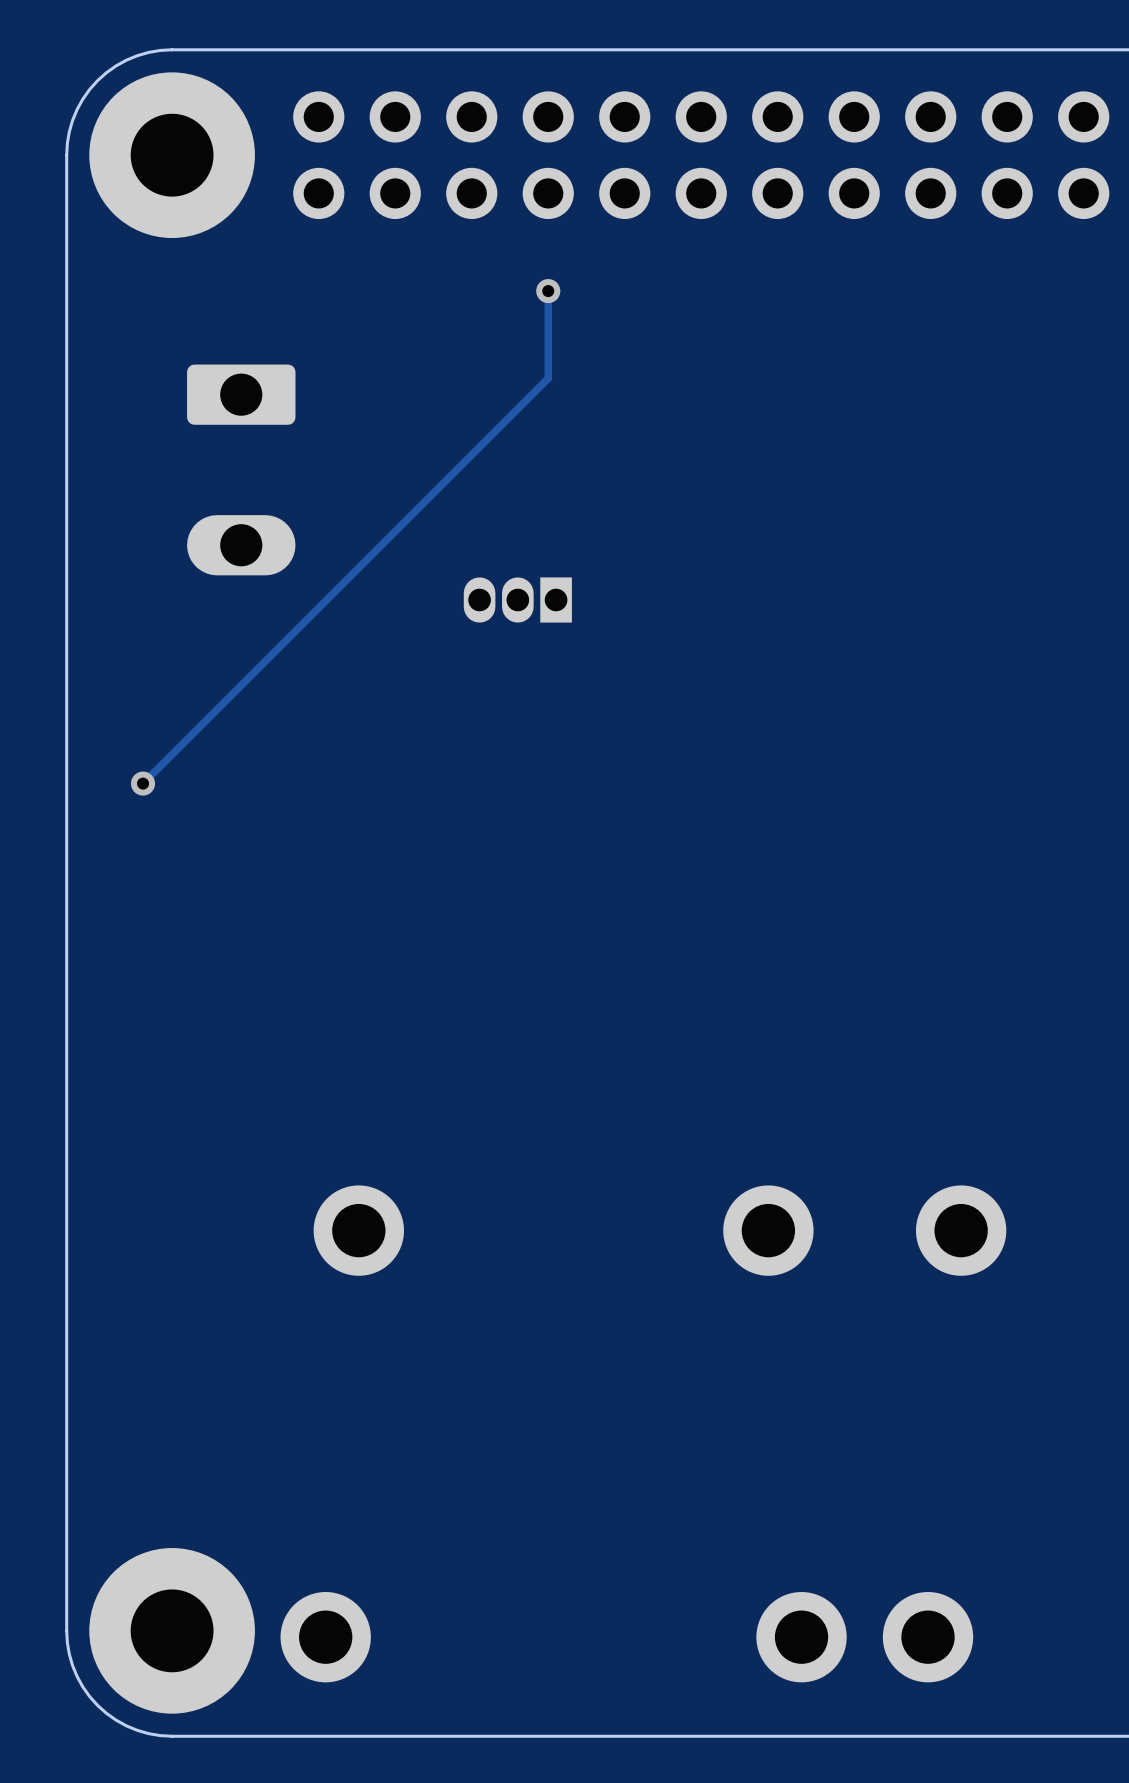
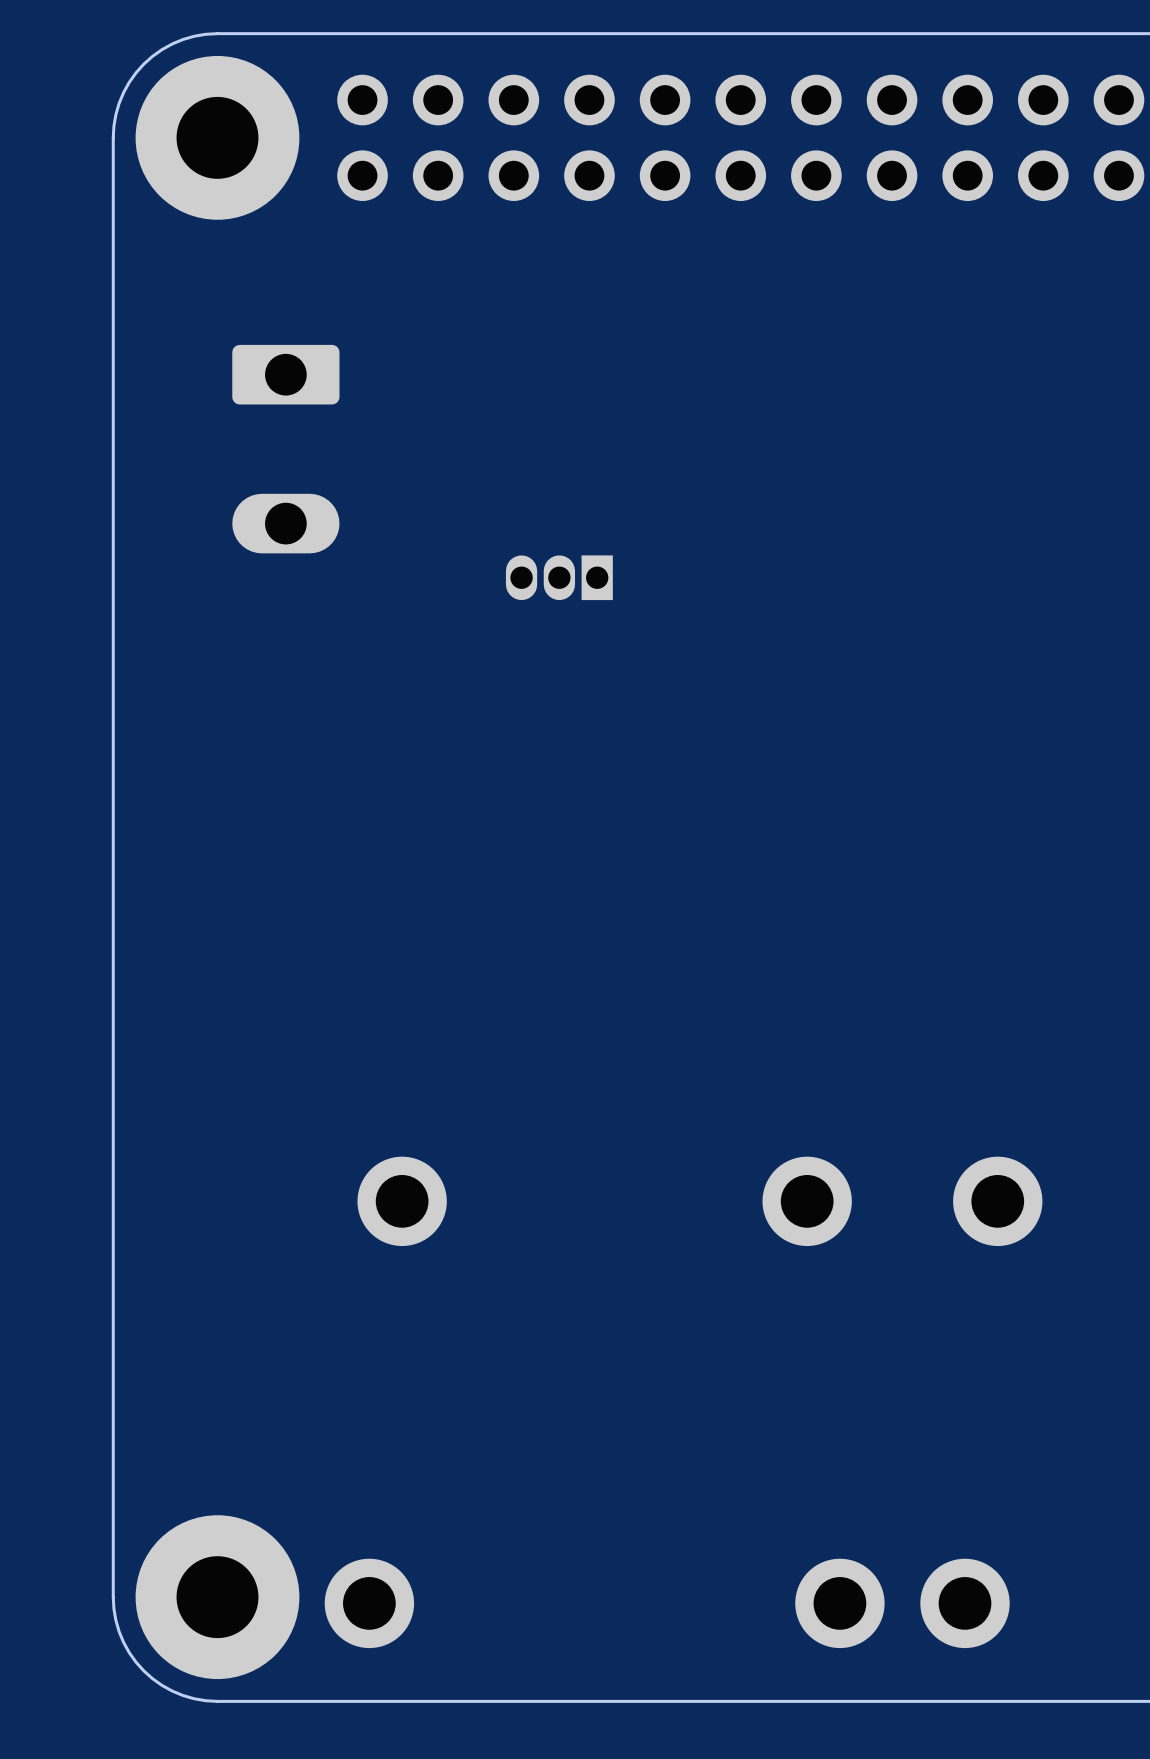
track: (548, 291) (548, 378) (143, 783) -> none
via: (548, 291) -> none
via: (143, 783) -> none

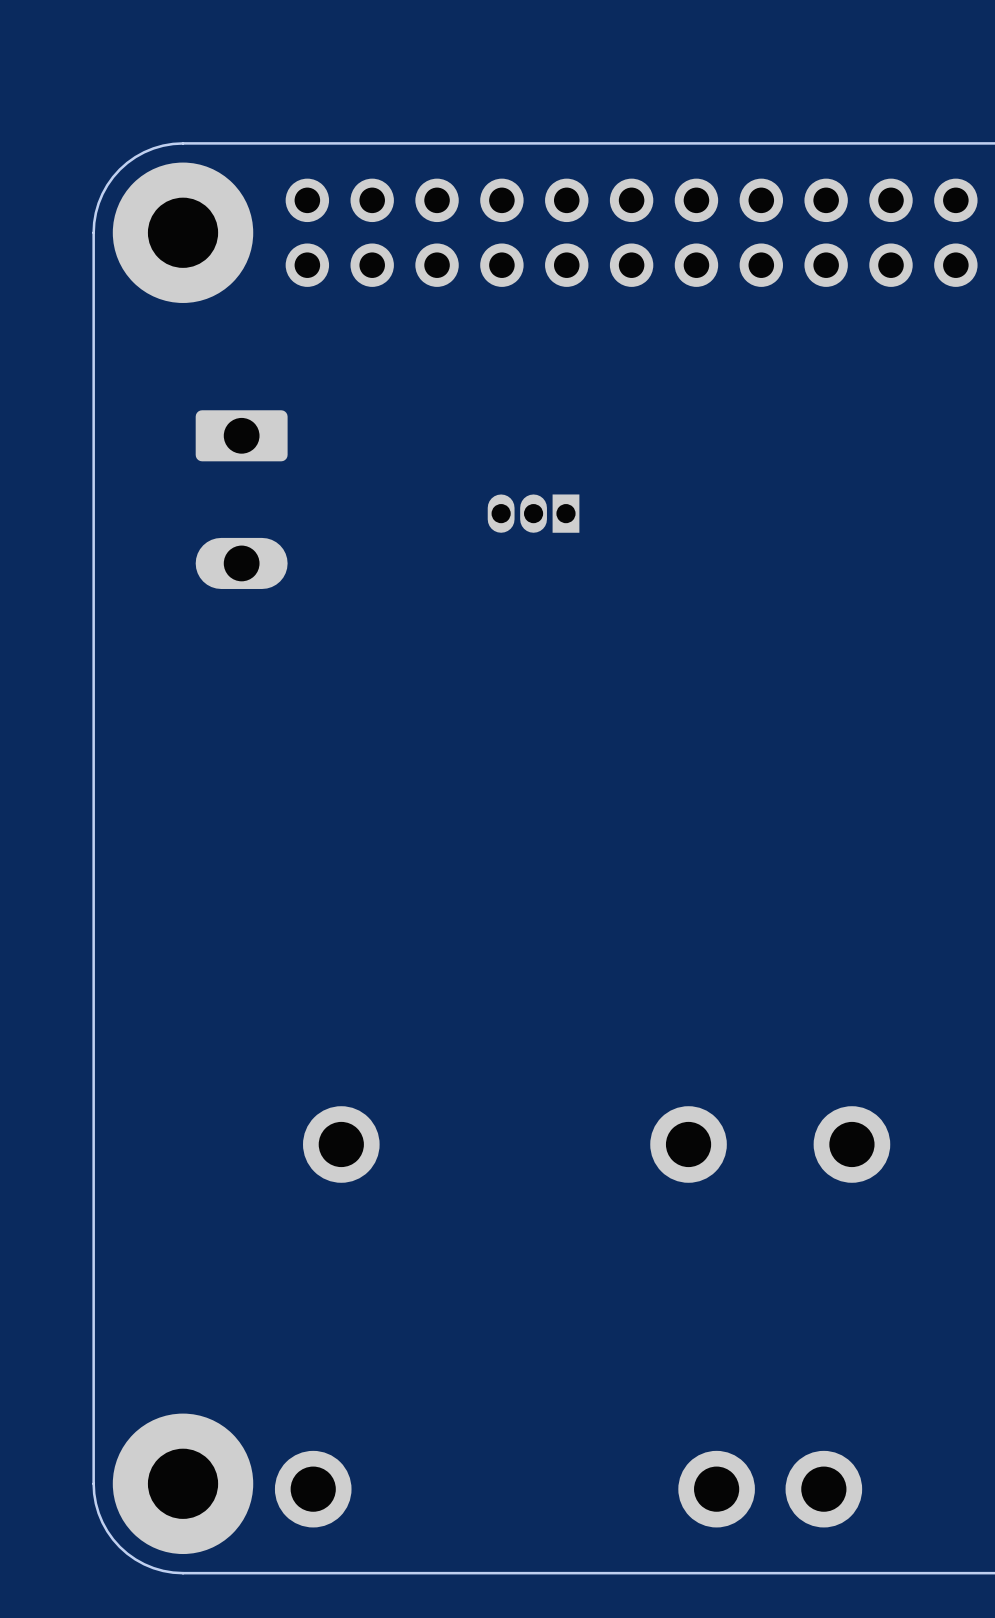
part position: (559, 577) -> (533, 513)

